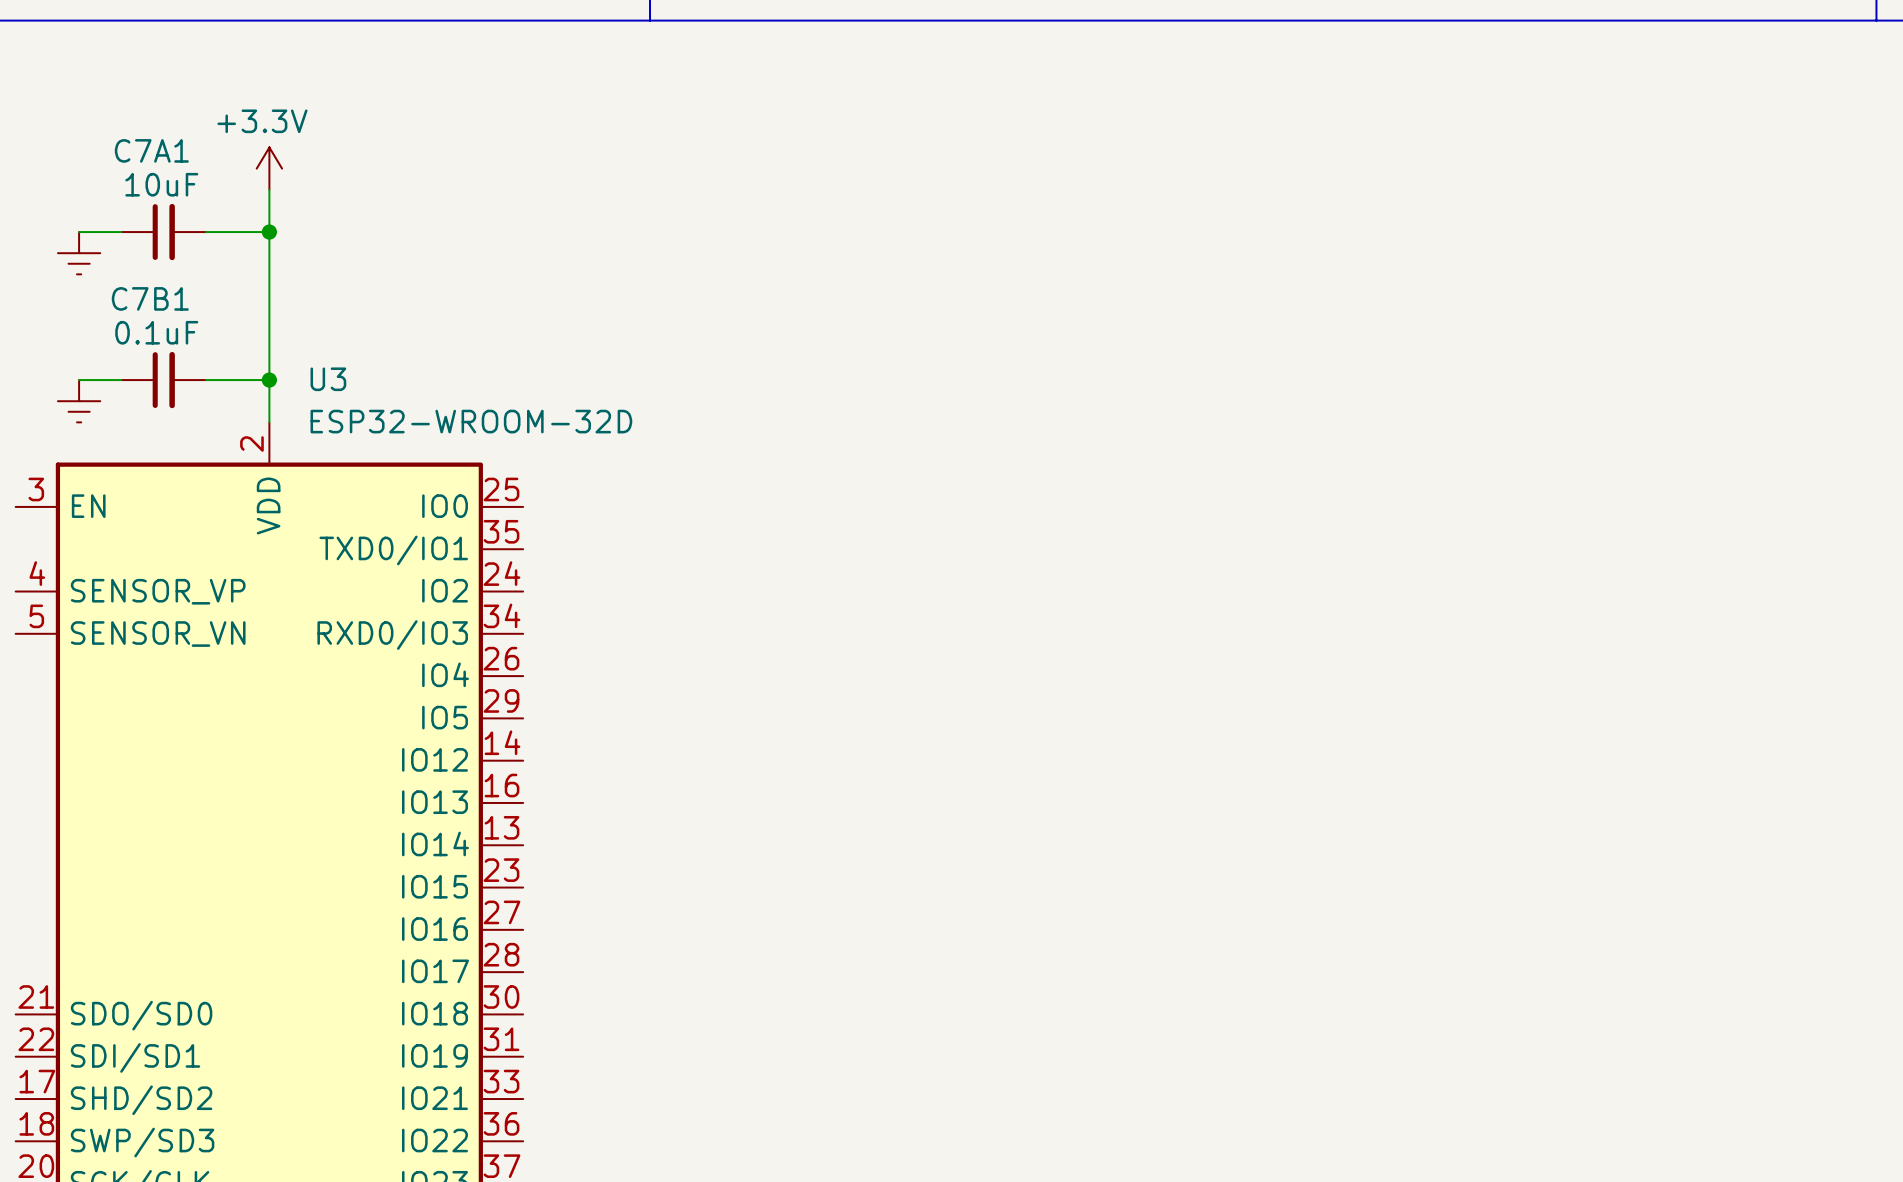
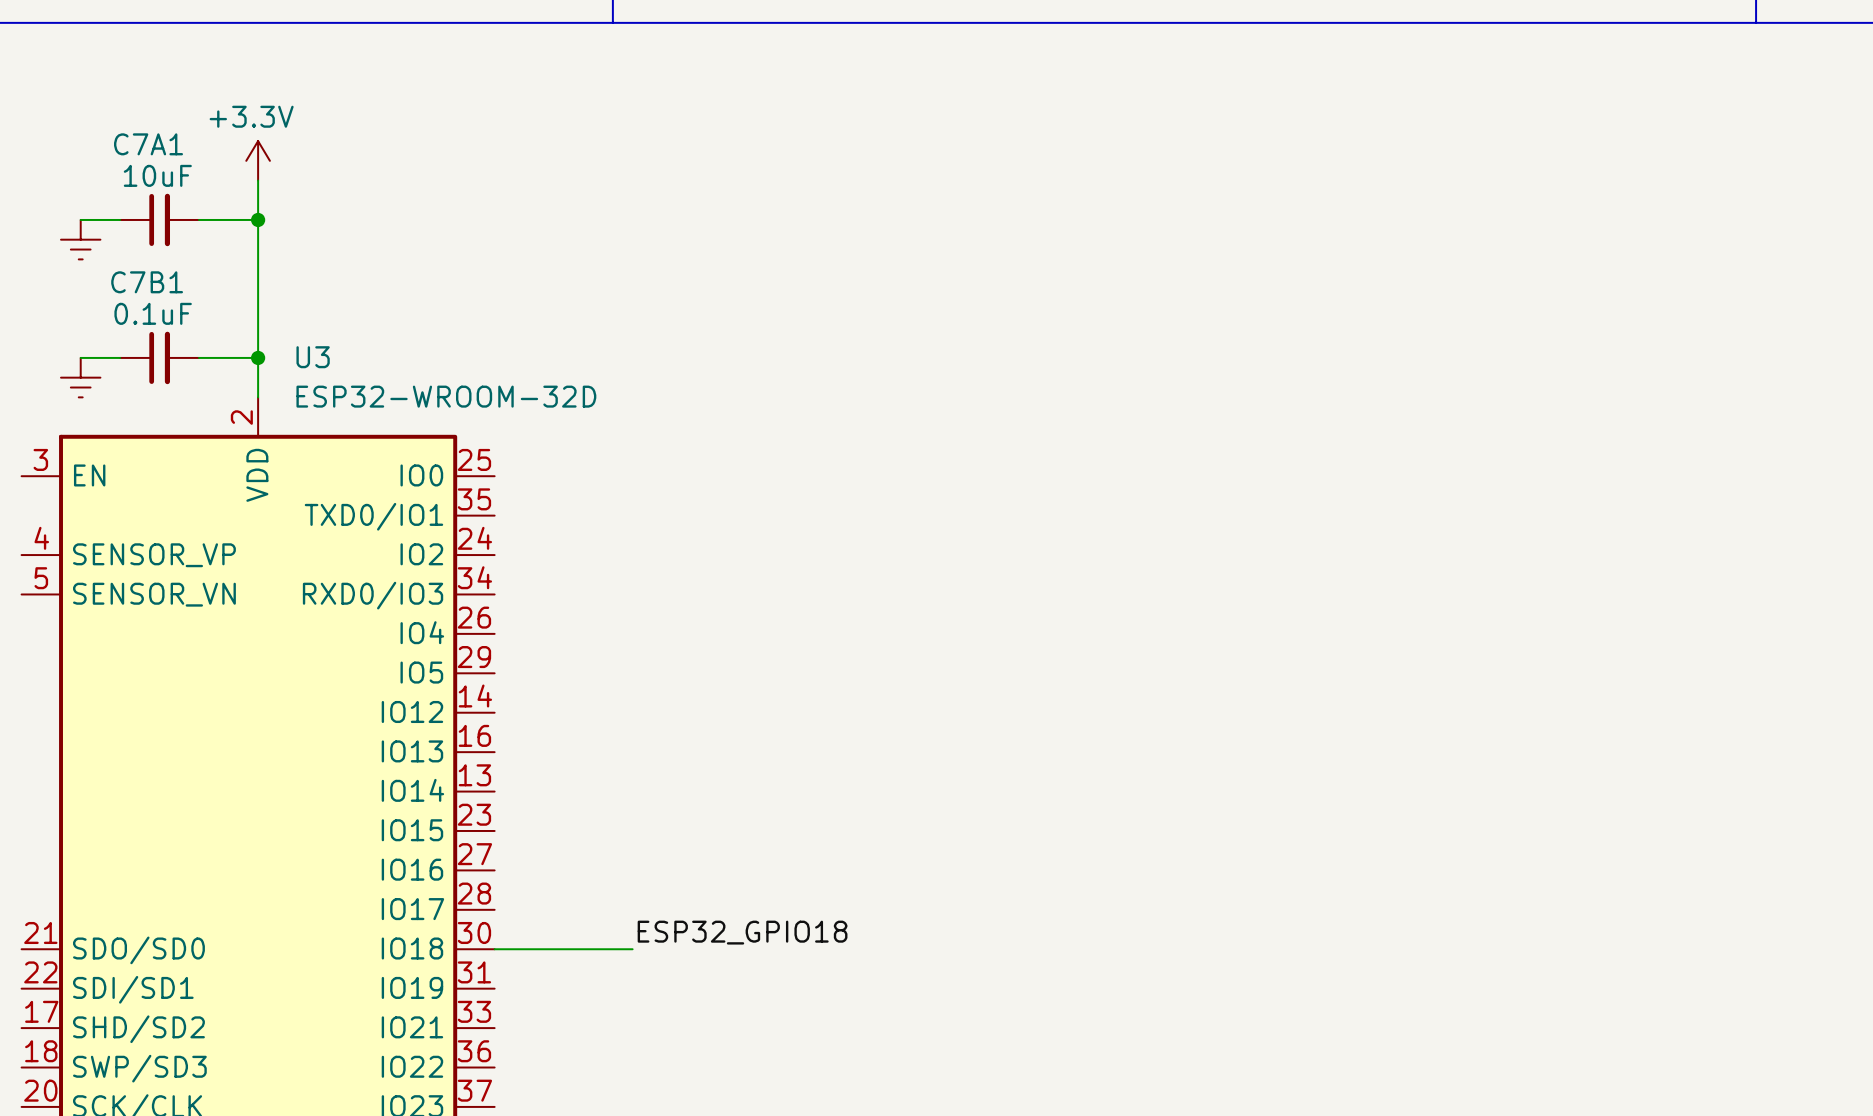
label: none -> ESP32_GPIO18 (742, 932)
wire: none -> (494, 949) (632, 949)

